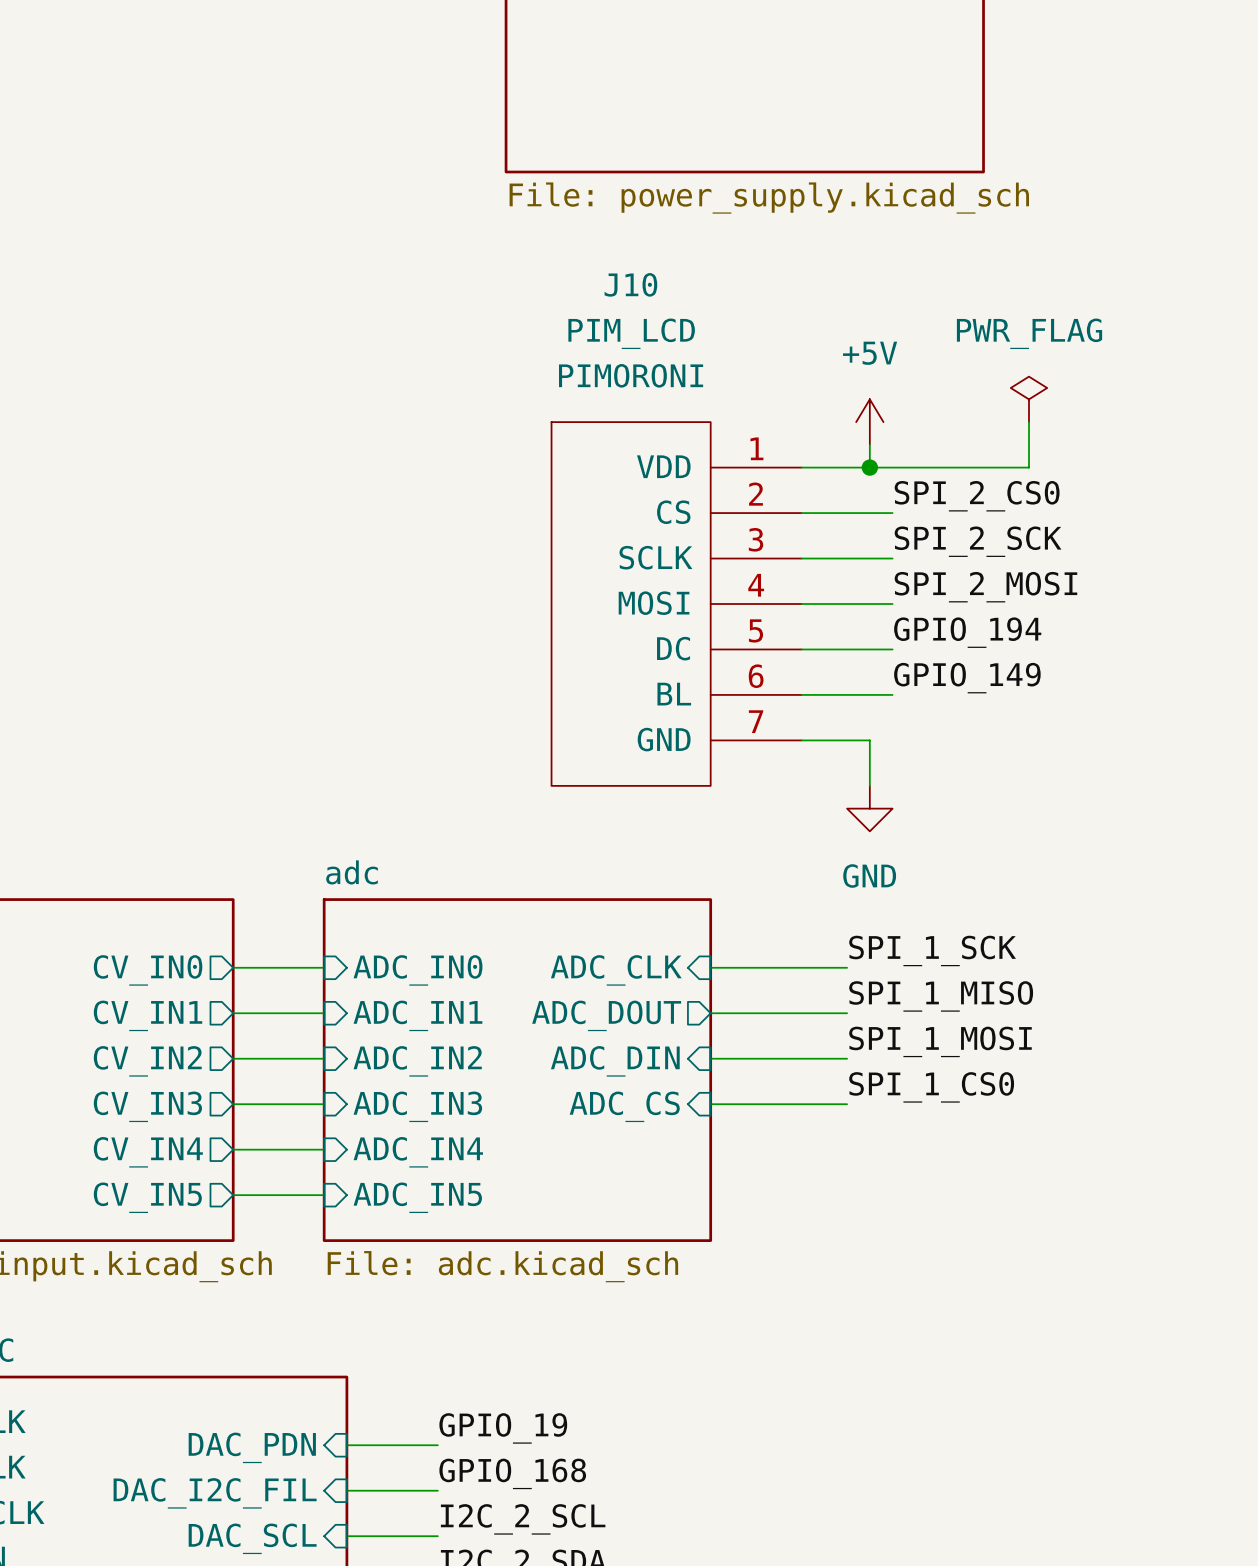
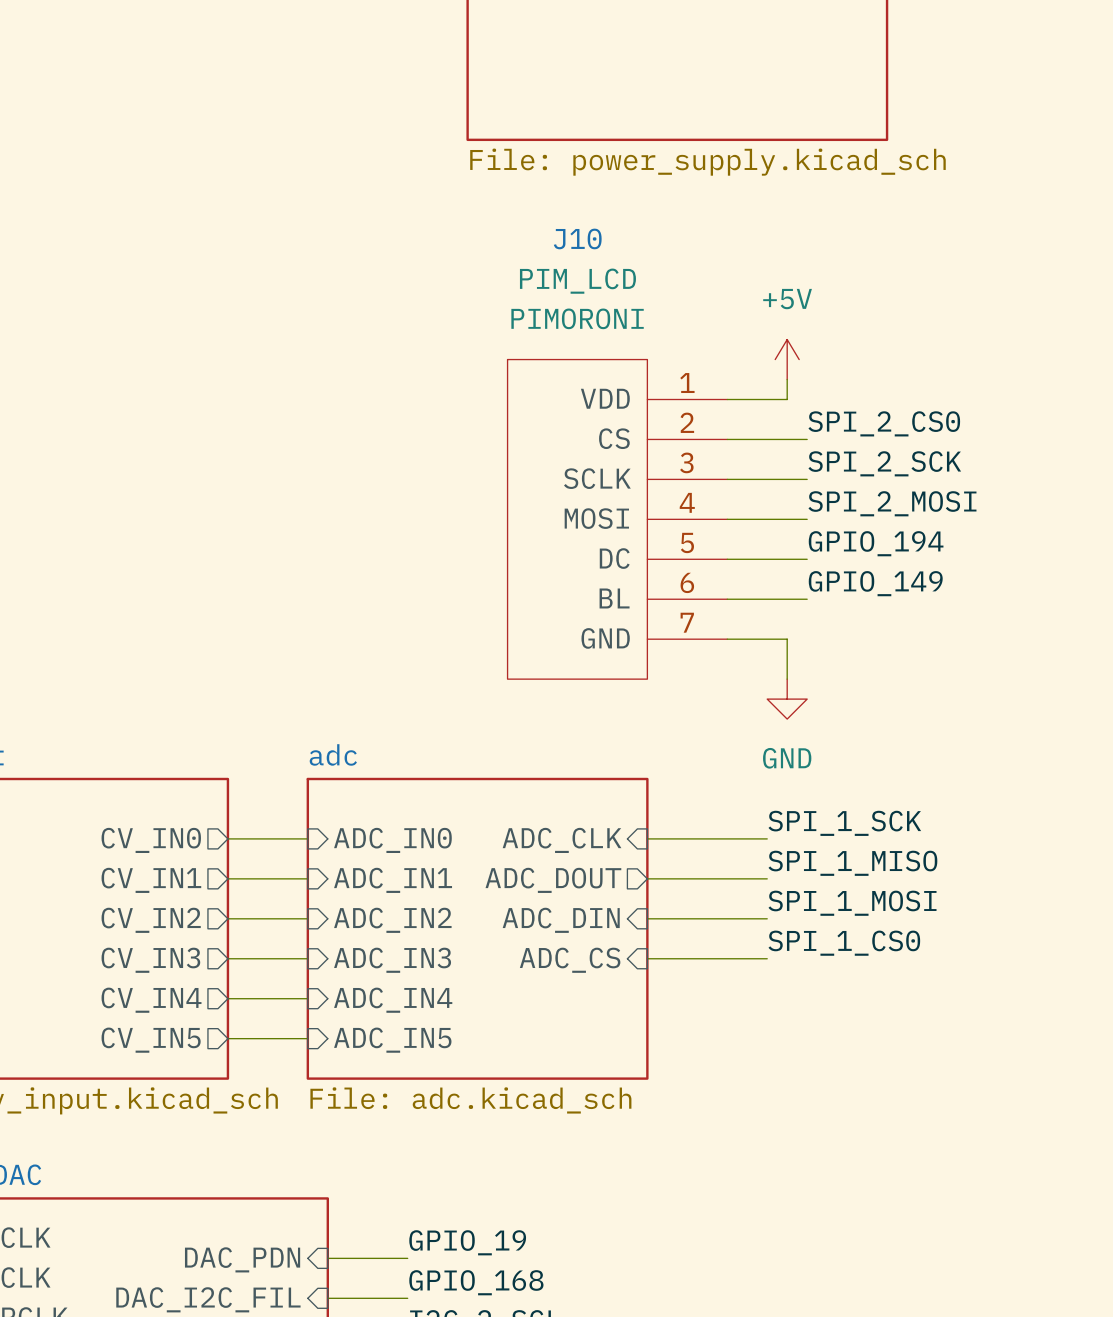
power symbol: PWR_FLAG (1028, 399) -> none
wire: (1028, 422) (1028, 467) (869, 467) -> none
junction: (869, 467) -> none

